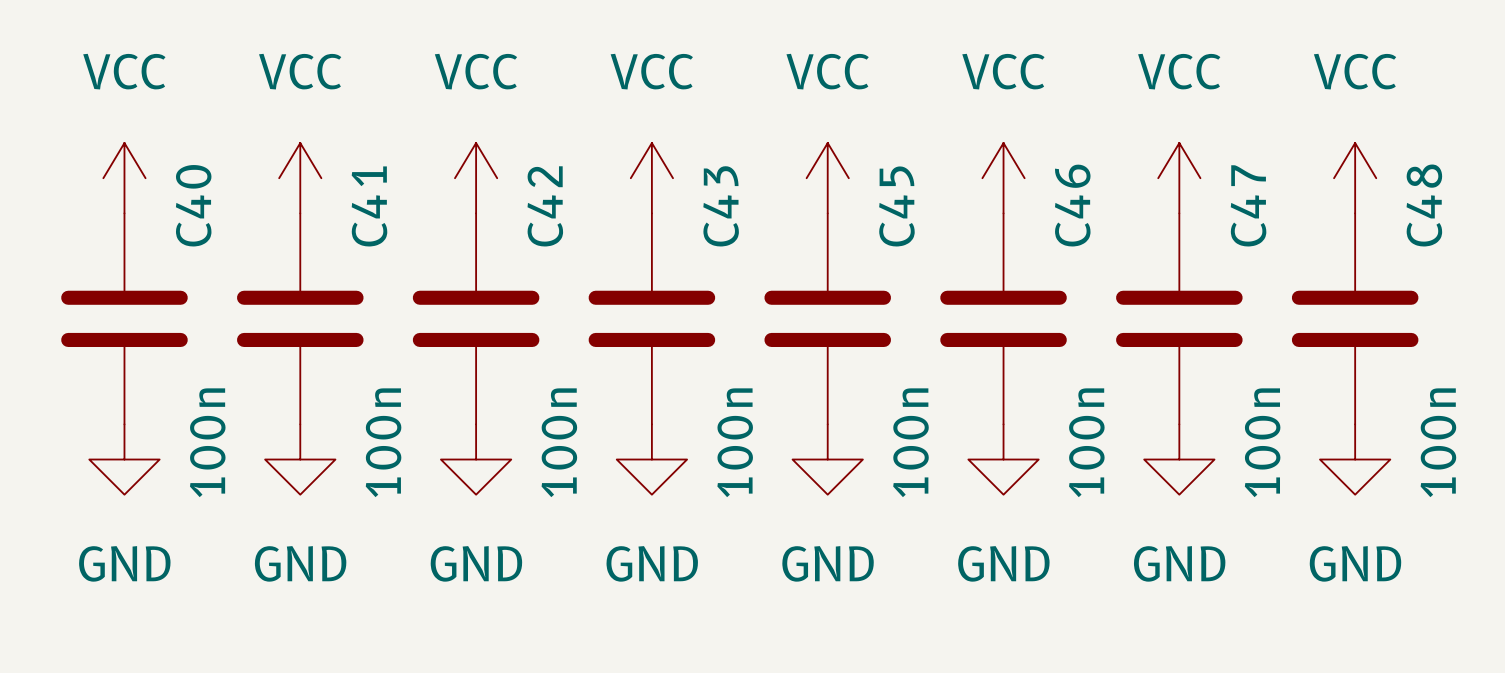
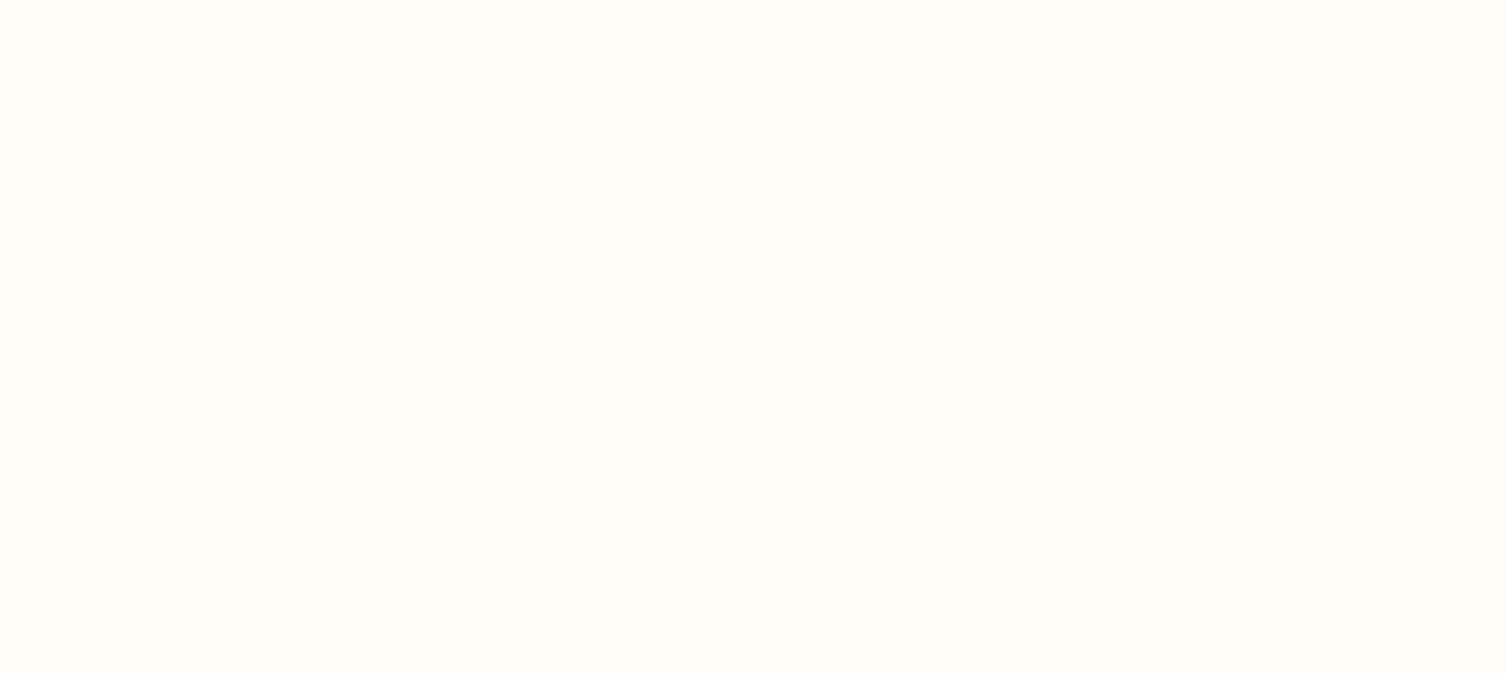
power symbol: VCC (124, 178) -> none
power symbol: VCC (300, 178) -> none
power symbol: VCC (476, 178) -> none
power symbol: VCC (651, 178) -> none
power symbol: VCC (827, 178) -> none
power symbol: VCC (1003, 178) -> none
power symbol: VCC (1179, 178) -> none
power symbol: VCC (1355, 178) -> none
C40: 100n (124, 318) -> none
C41: 100n (300, 318) -> none
C42: 100n (476, 318) -> none
C43: 100n (651, 318) -> none
C45: 100n (827, 318) -> none
C46: 100n (1003, 318) -> none
C47: 100n (1179, 318) -> none
C48: 100n (1355, 318) -> none
power symbol: GND (124, 459) -> none
power symbol: GND (300, 459) -> none
power symbol: GND (476, 459) -> none
power symbol: GND (651, 459) -> none
power symbol: GND (827, 459) -> none
power symbol: GND (1003, 459) -> none
power symbol: GND (1179, 459) -> none
power symbol: GND (1355, 459) -> none

